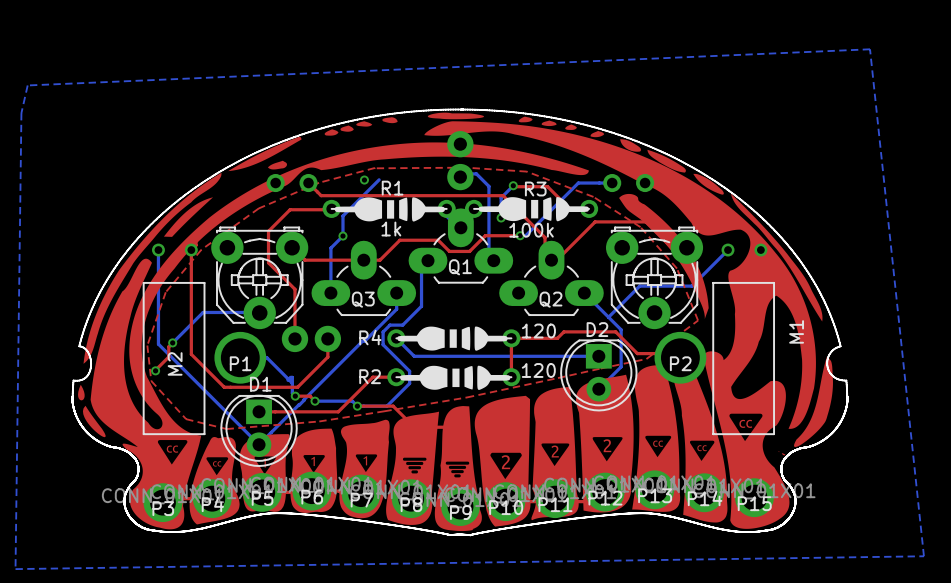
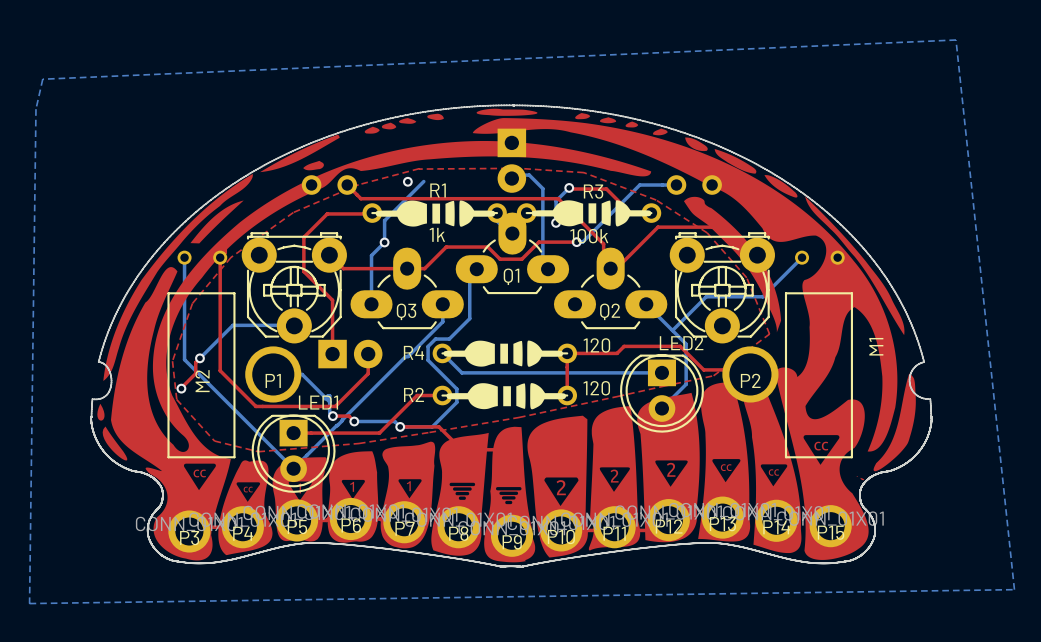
part footprint: [447, 131, 474, 191] -> [497, 128, 527, 193]
part footprint: [281, 325, 342, 353] -> [318, 339, 383, 369]
D2 name: D2 (597, 329) -> LED2 (681, 343)
D1 name: D1 (260, 384) -> LED1 (318, 402)

